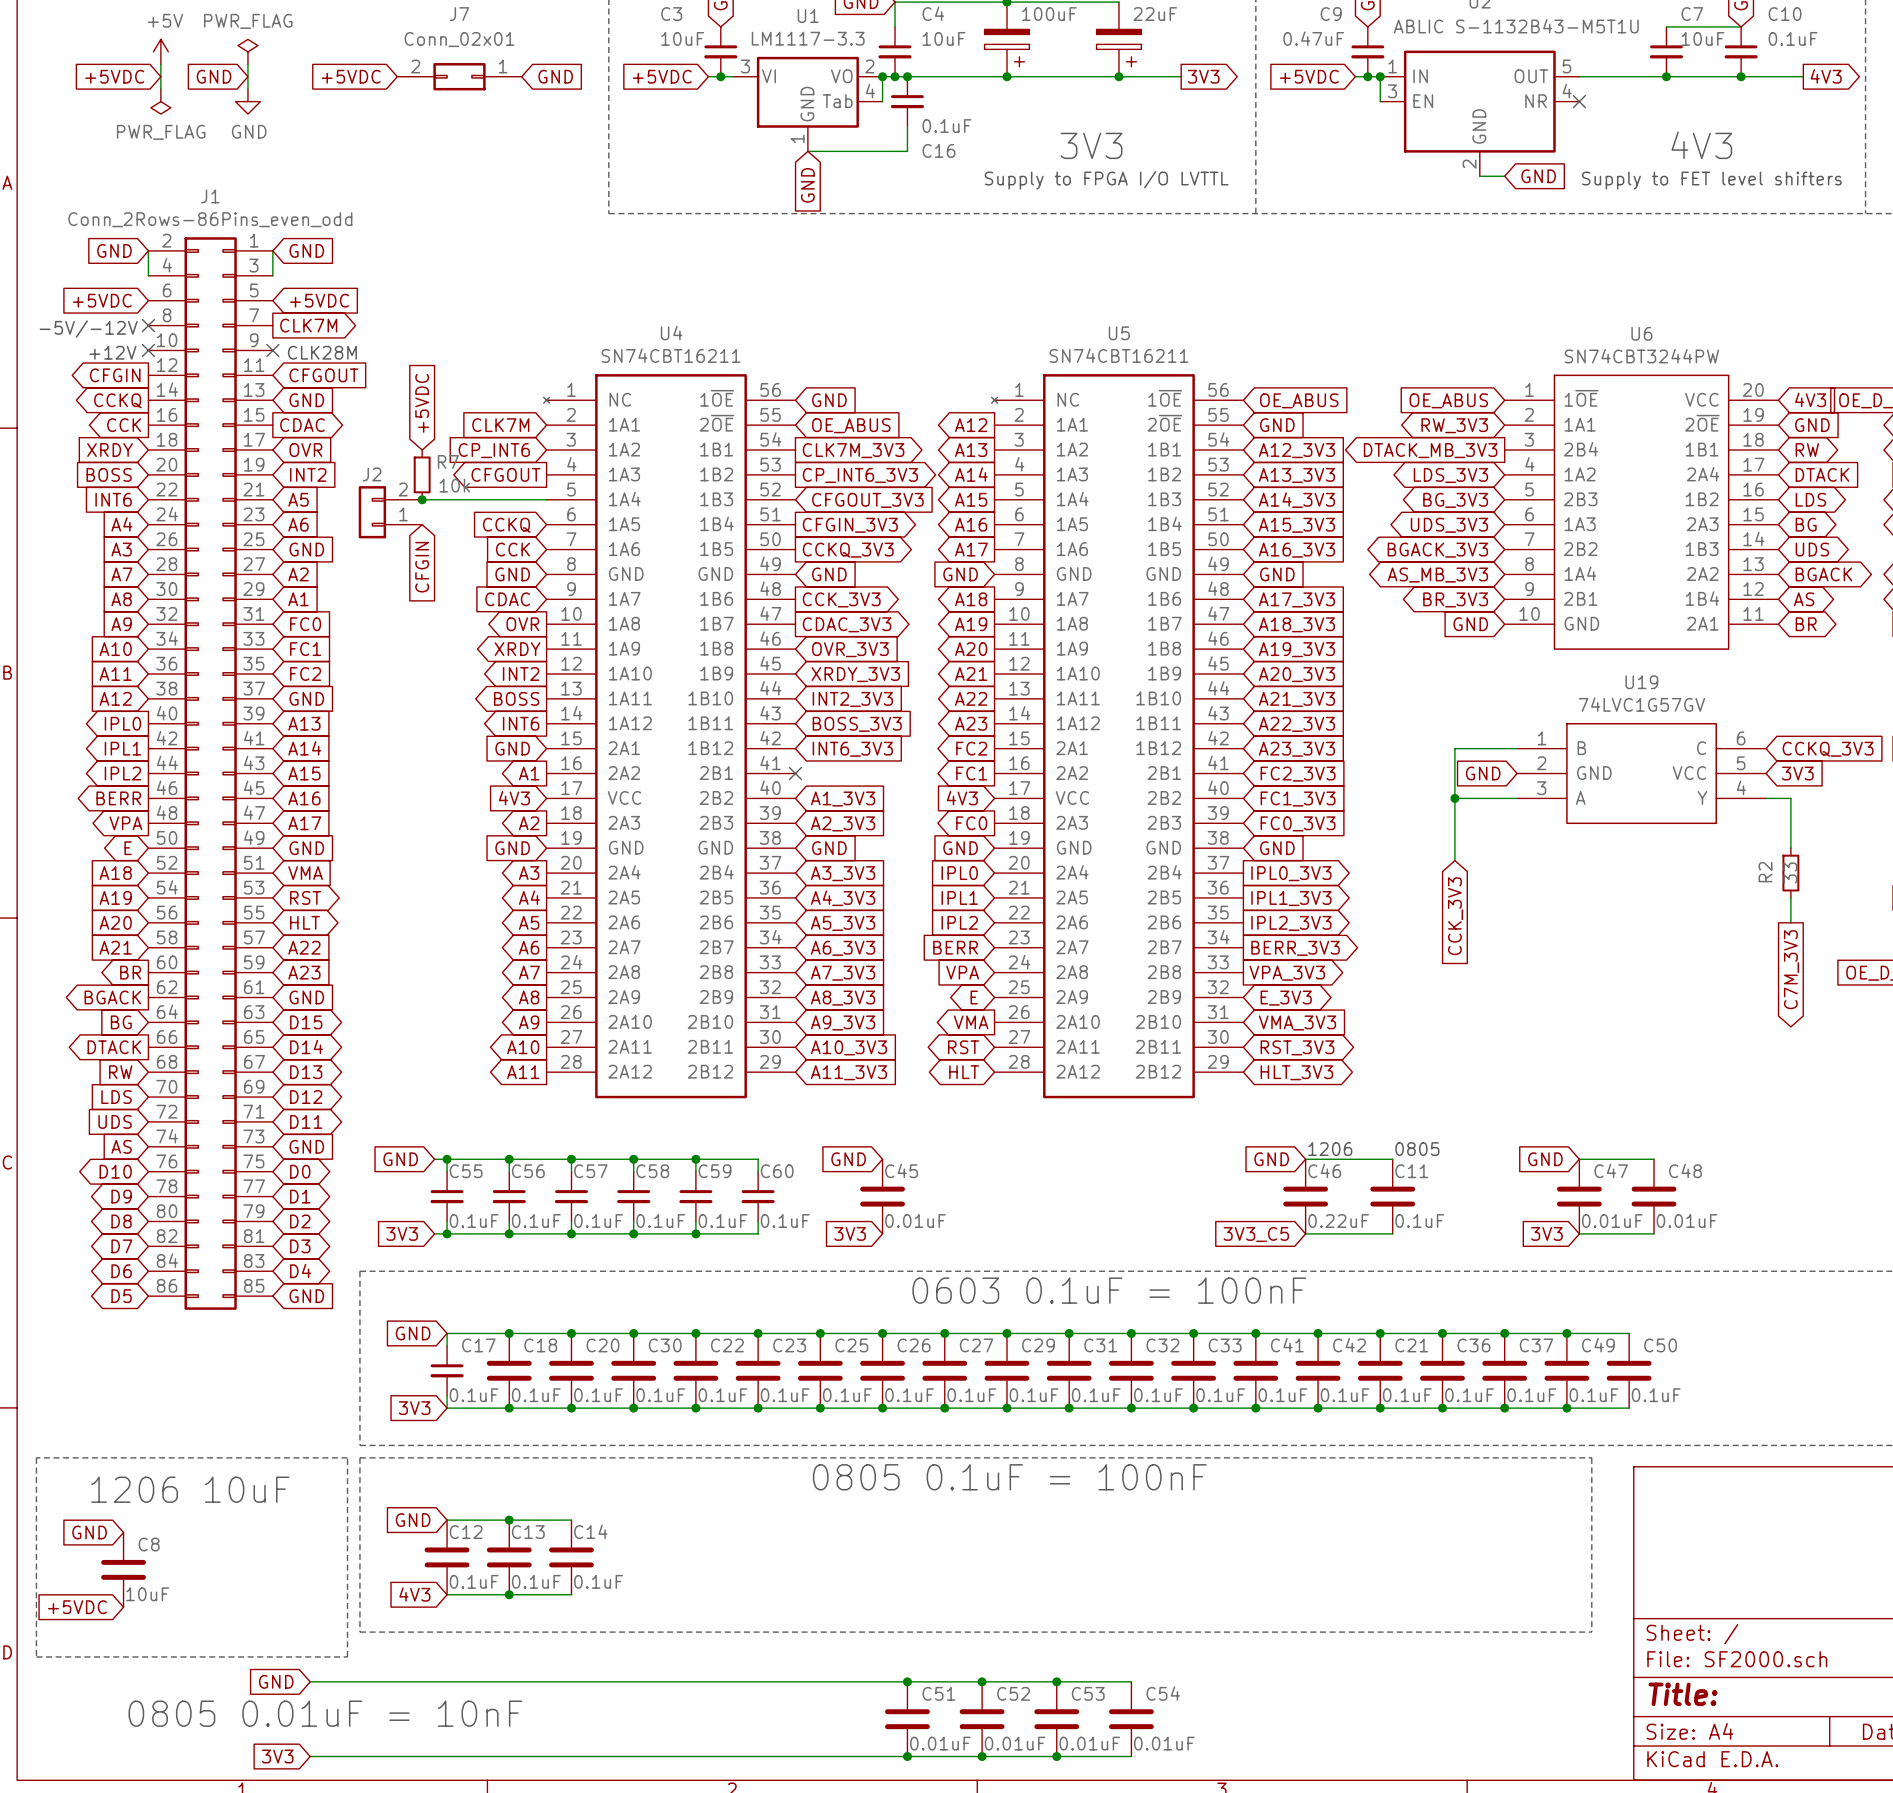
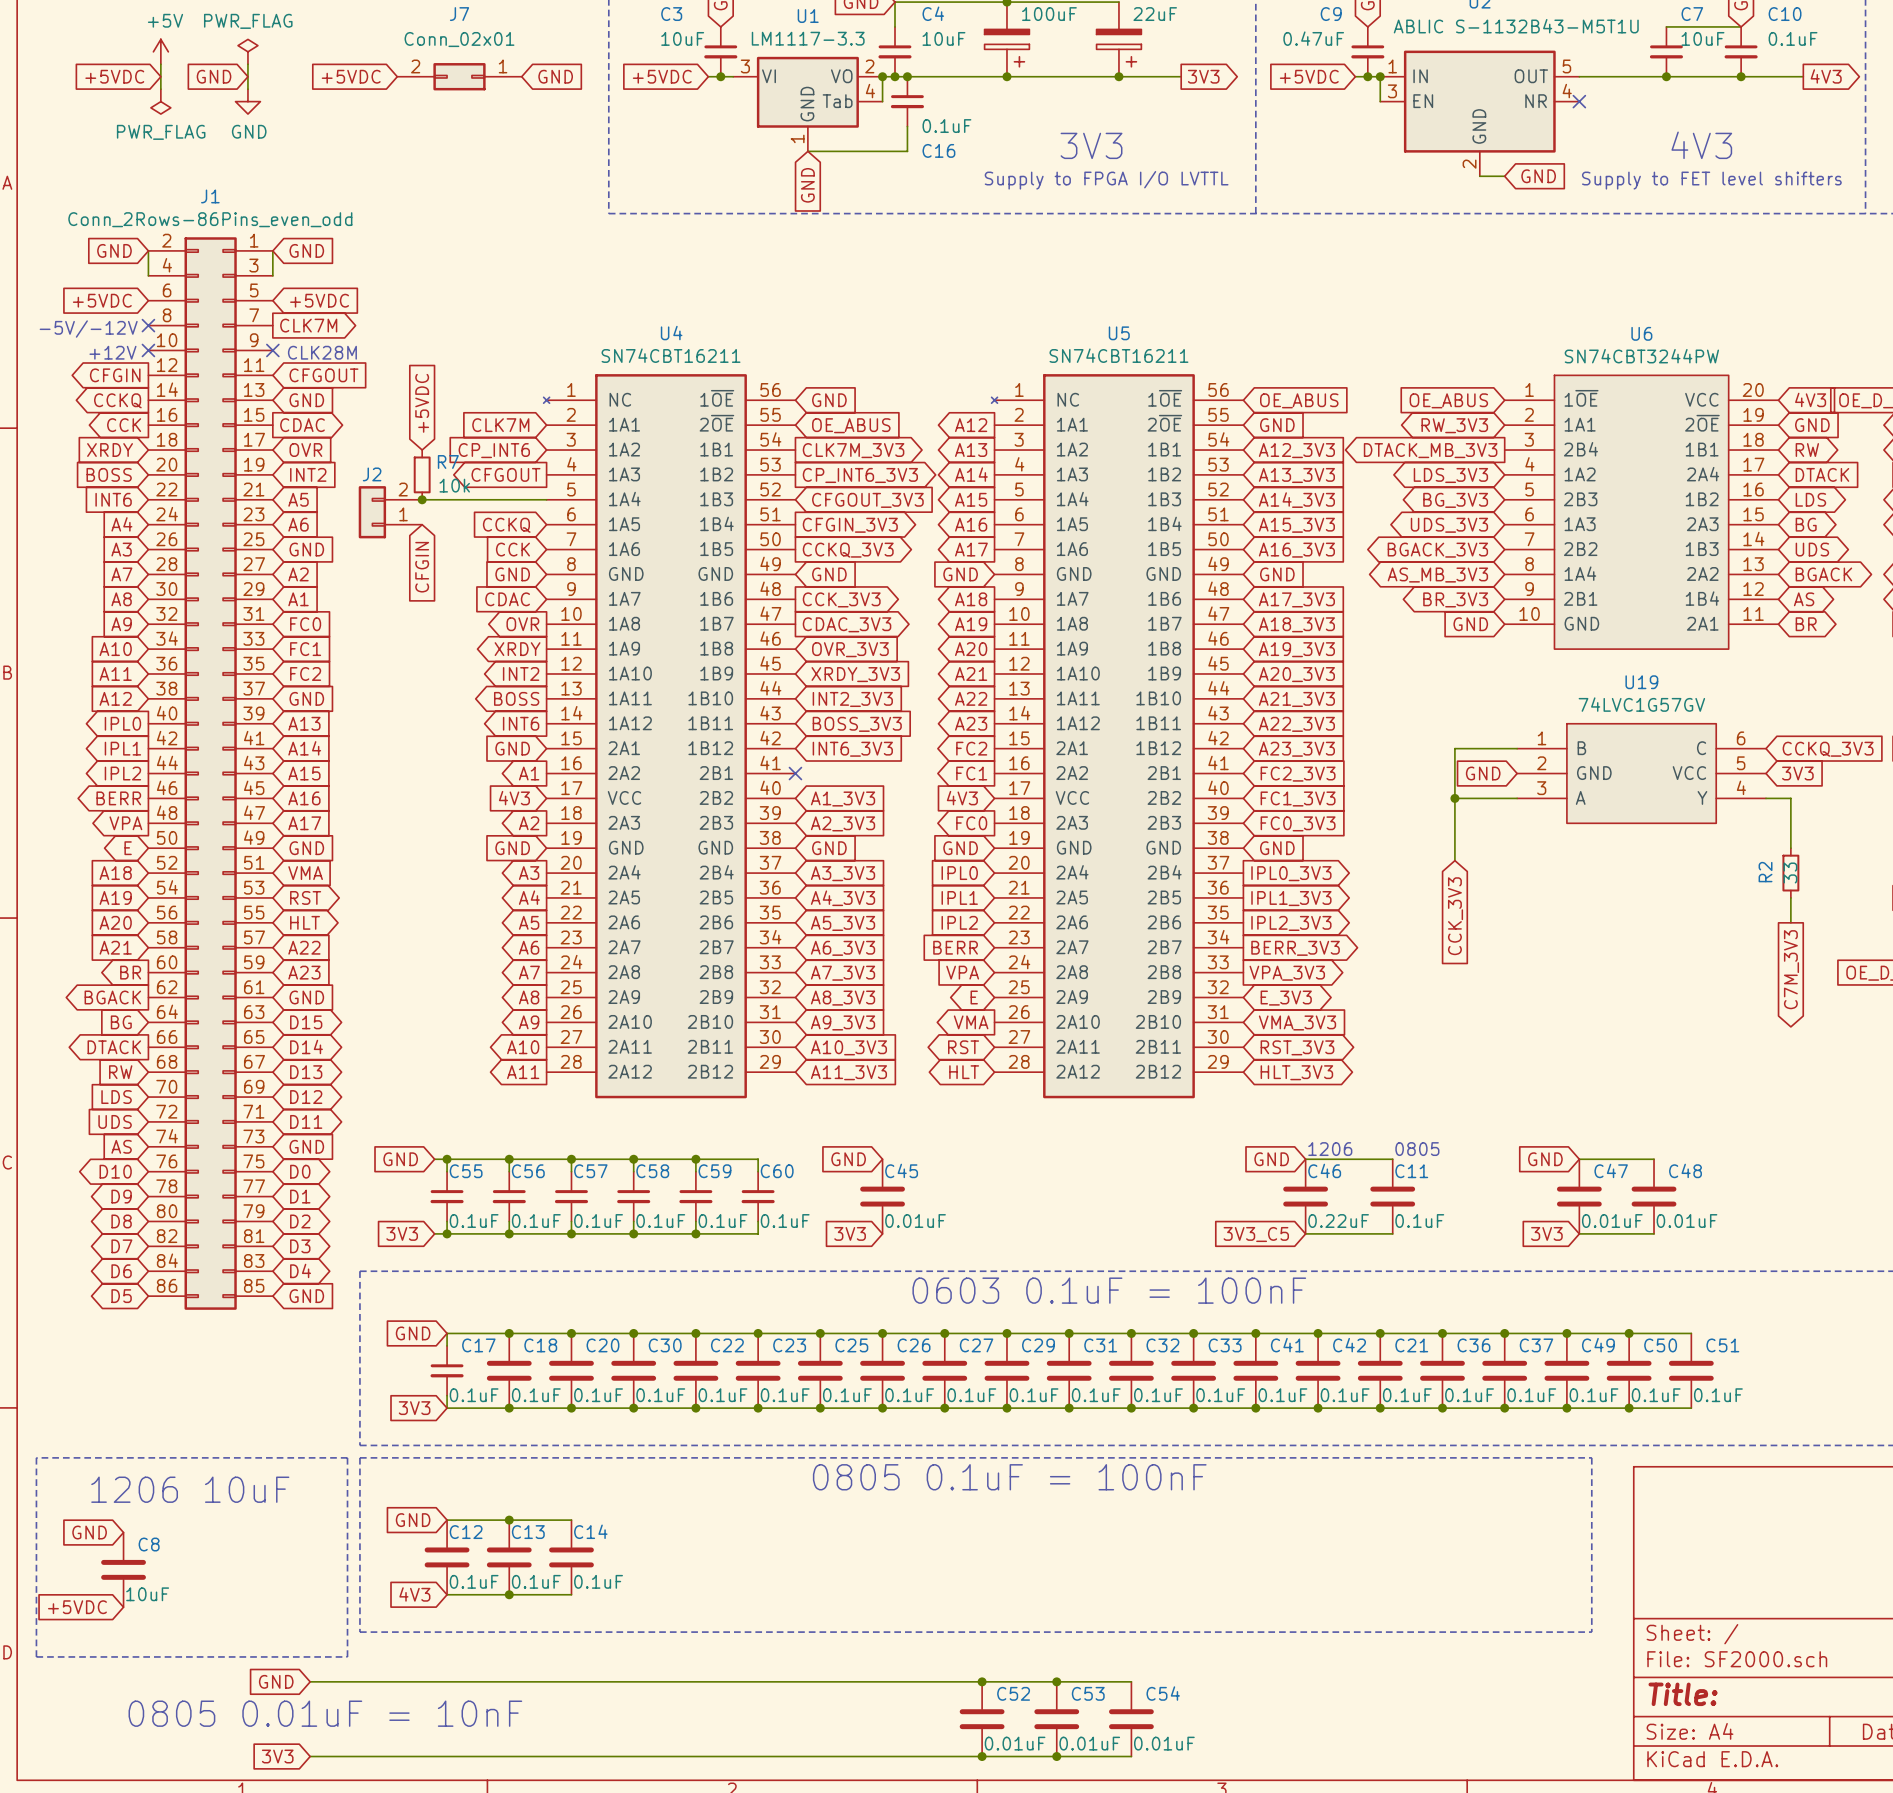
wire: none -> (1629, 1333) (1691, 1333)
junction: none -> (1629, 1333)
wire: none -> (1629, 1408) (1691, 1408)
junction: none -> (1629, 1408)
junction: (907, 1681) -> none
C51 position: (907, 1719) -> (1691, 1370)
C51 value: 0.01uF (940, 1743) -> 0.1uF (1718, 1395)
junction: (907, 1756) -> none

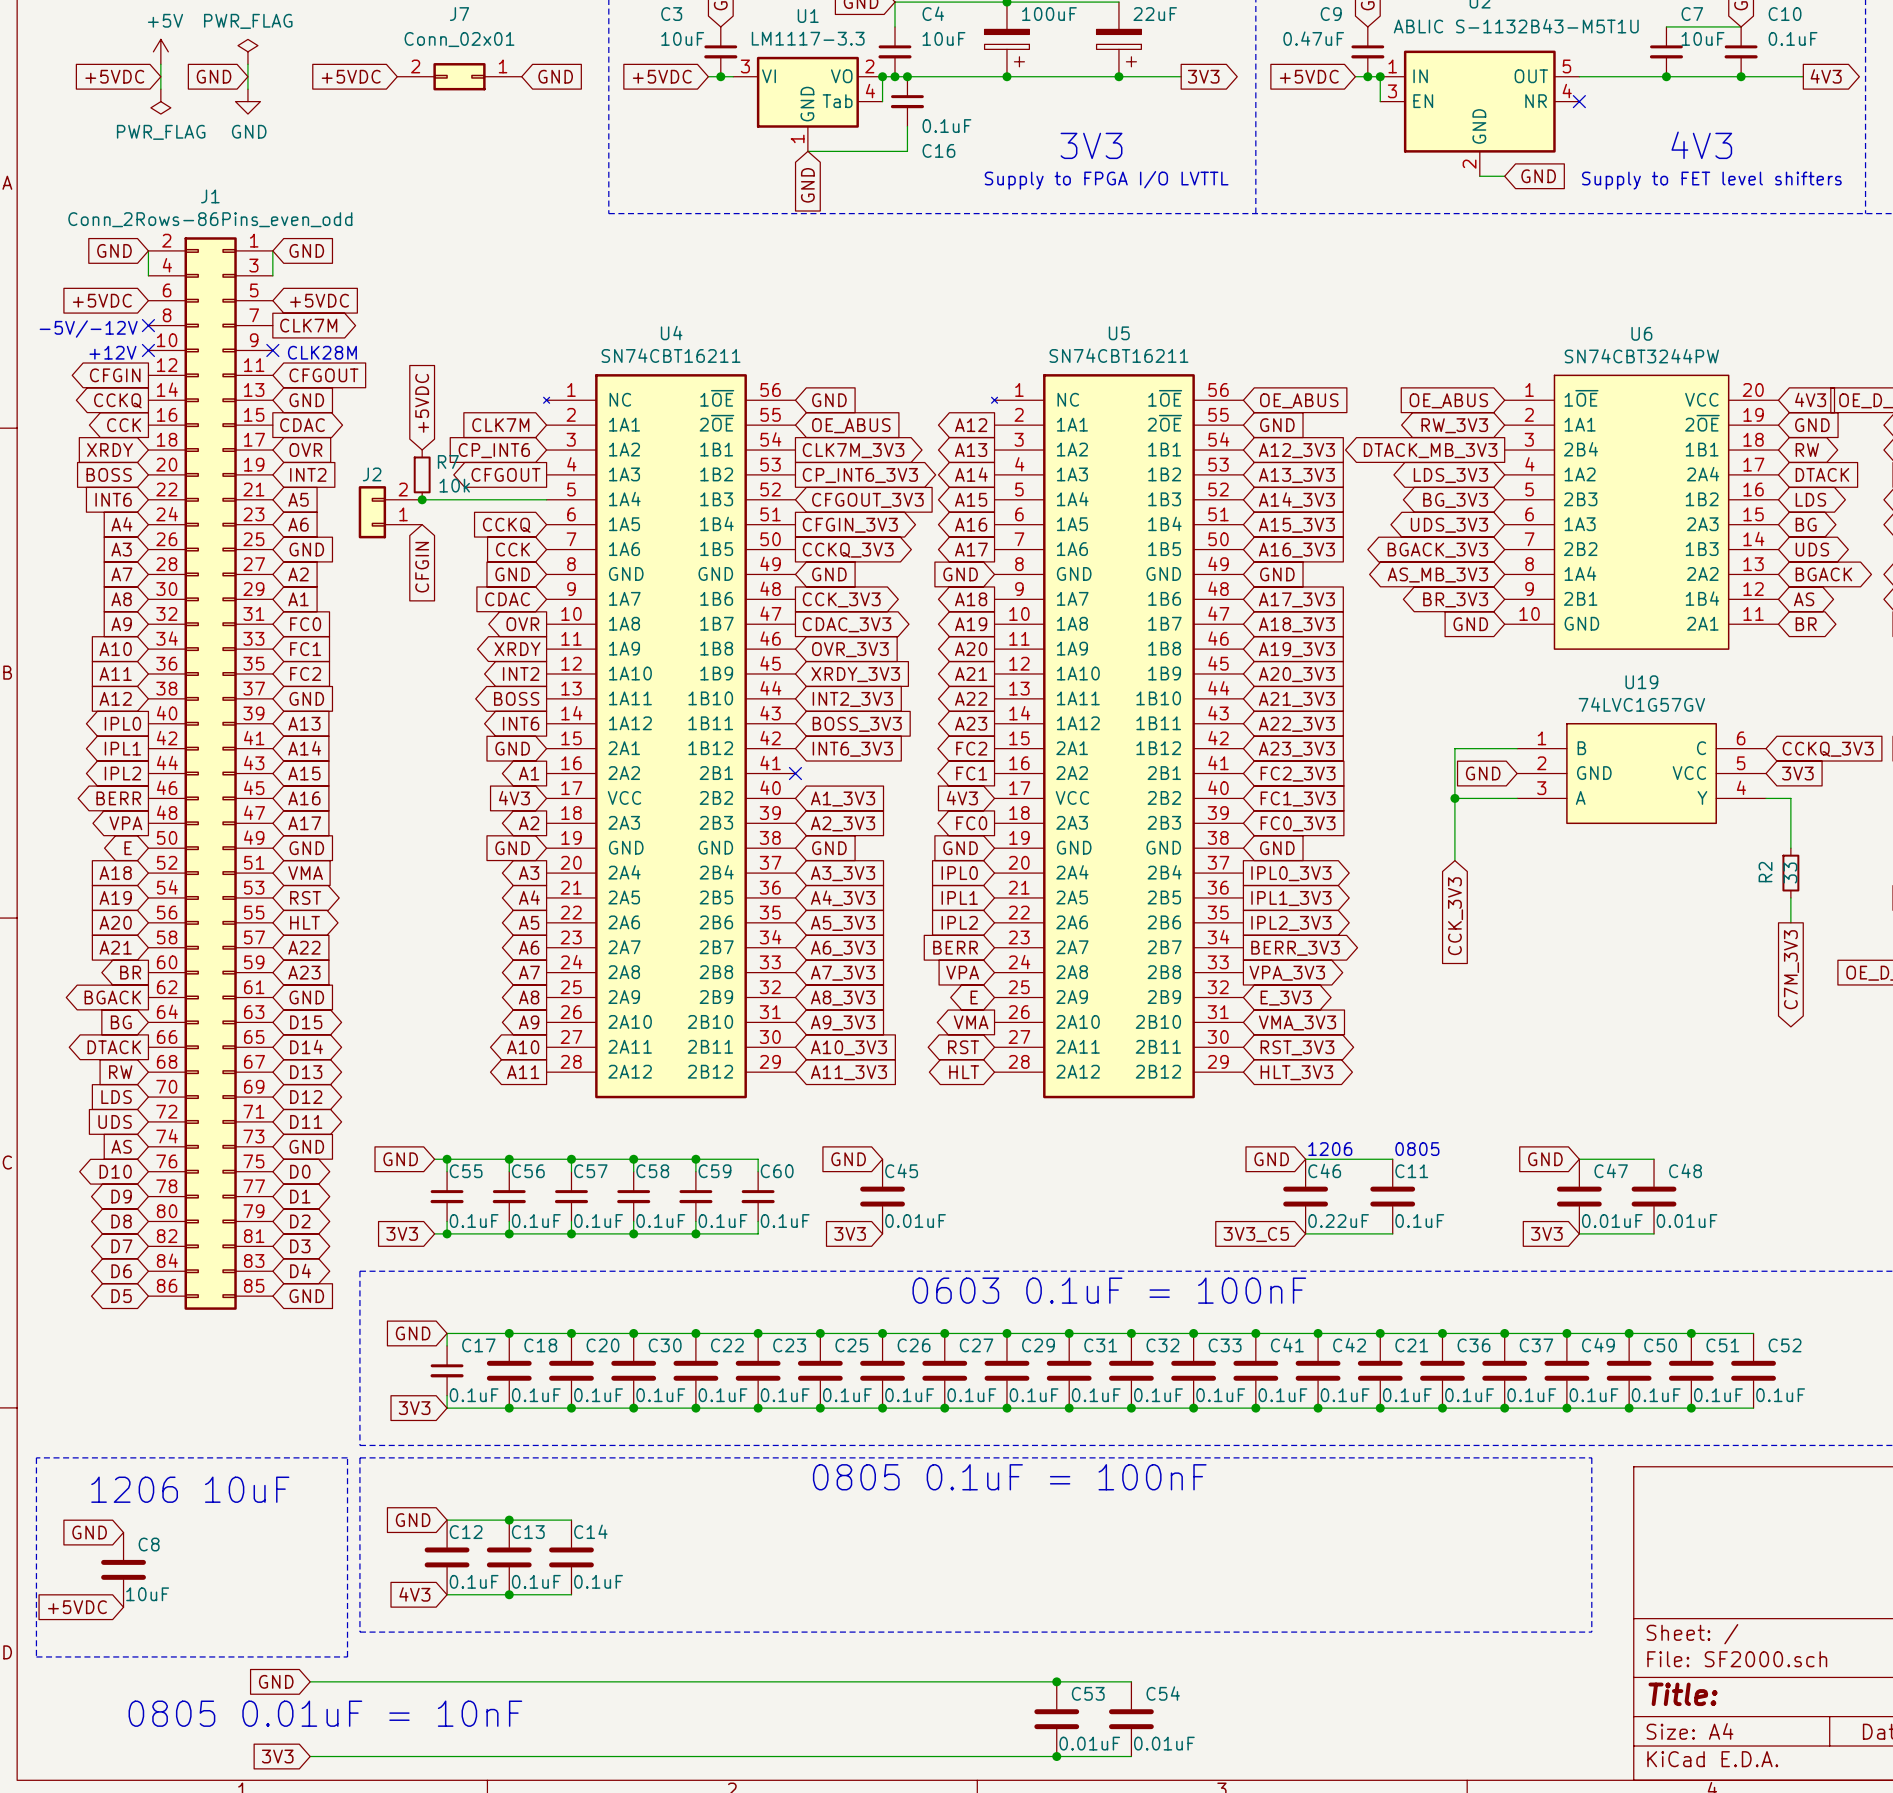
wire: none -> (1691, 1333) (1753, 1333)
junction: none -> (1691, 1333)
wire: none -> (1691, 1408) (1753, 1408)
junction: none -> (1691, 1408)
junction: (982, 1681) -> none
C52 position: (982, 1719) -> (1753, 1370)
C52 value: 0.01uF (1015, 1743) -> 0.1uF (1780, 1395)
junction: (982, 1756) -> none

